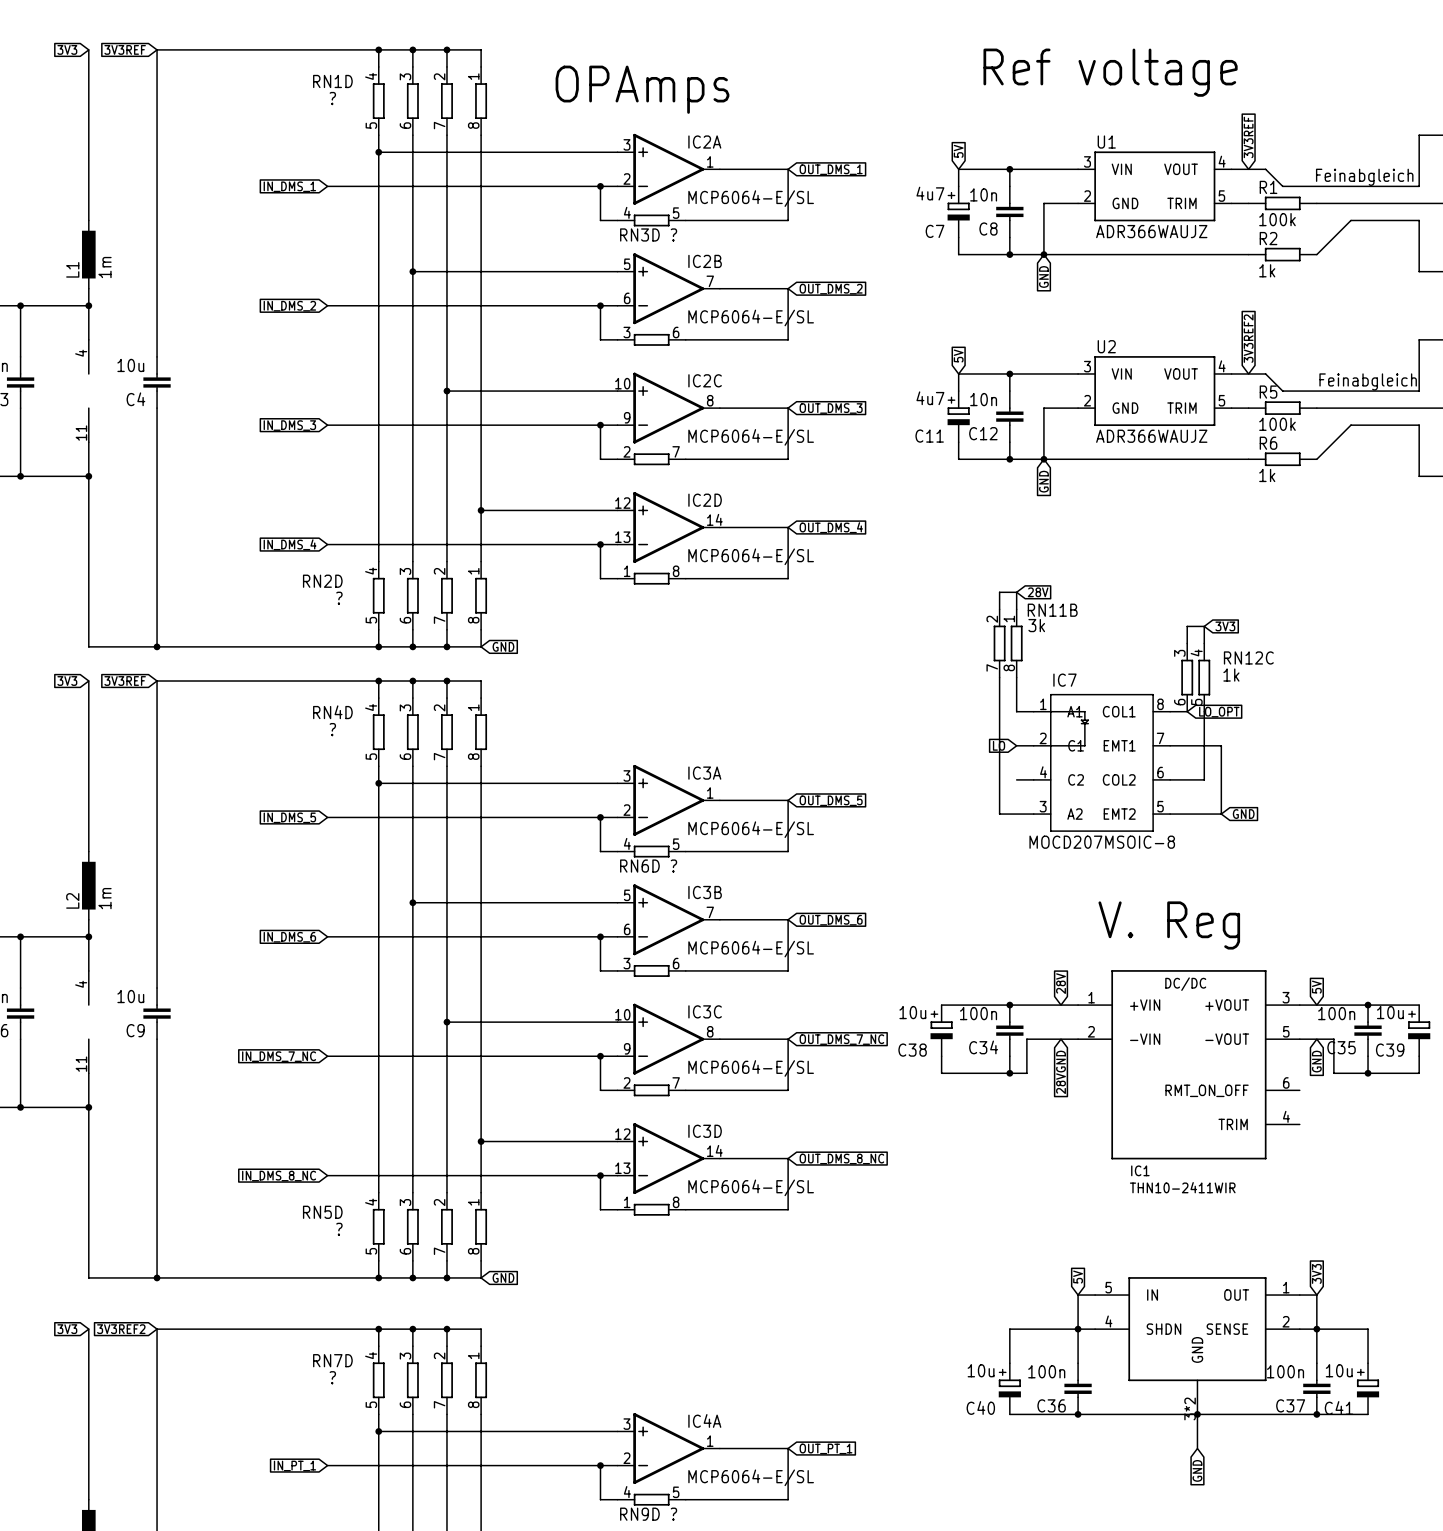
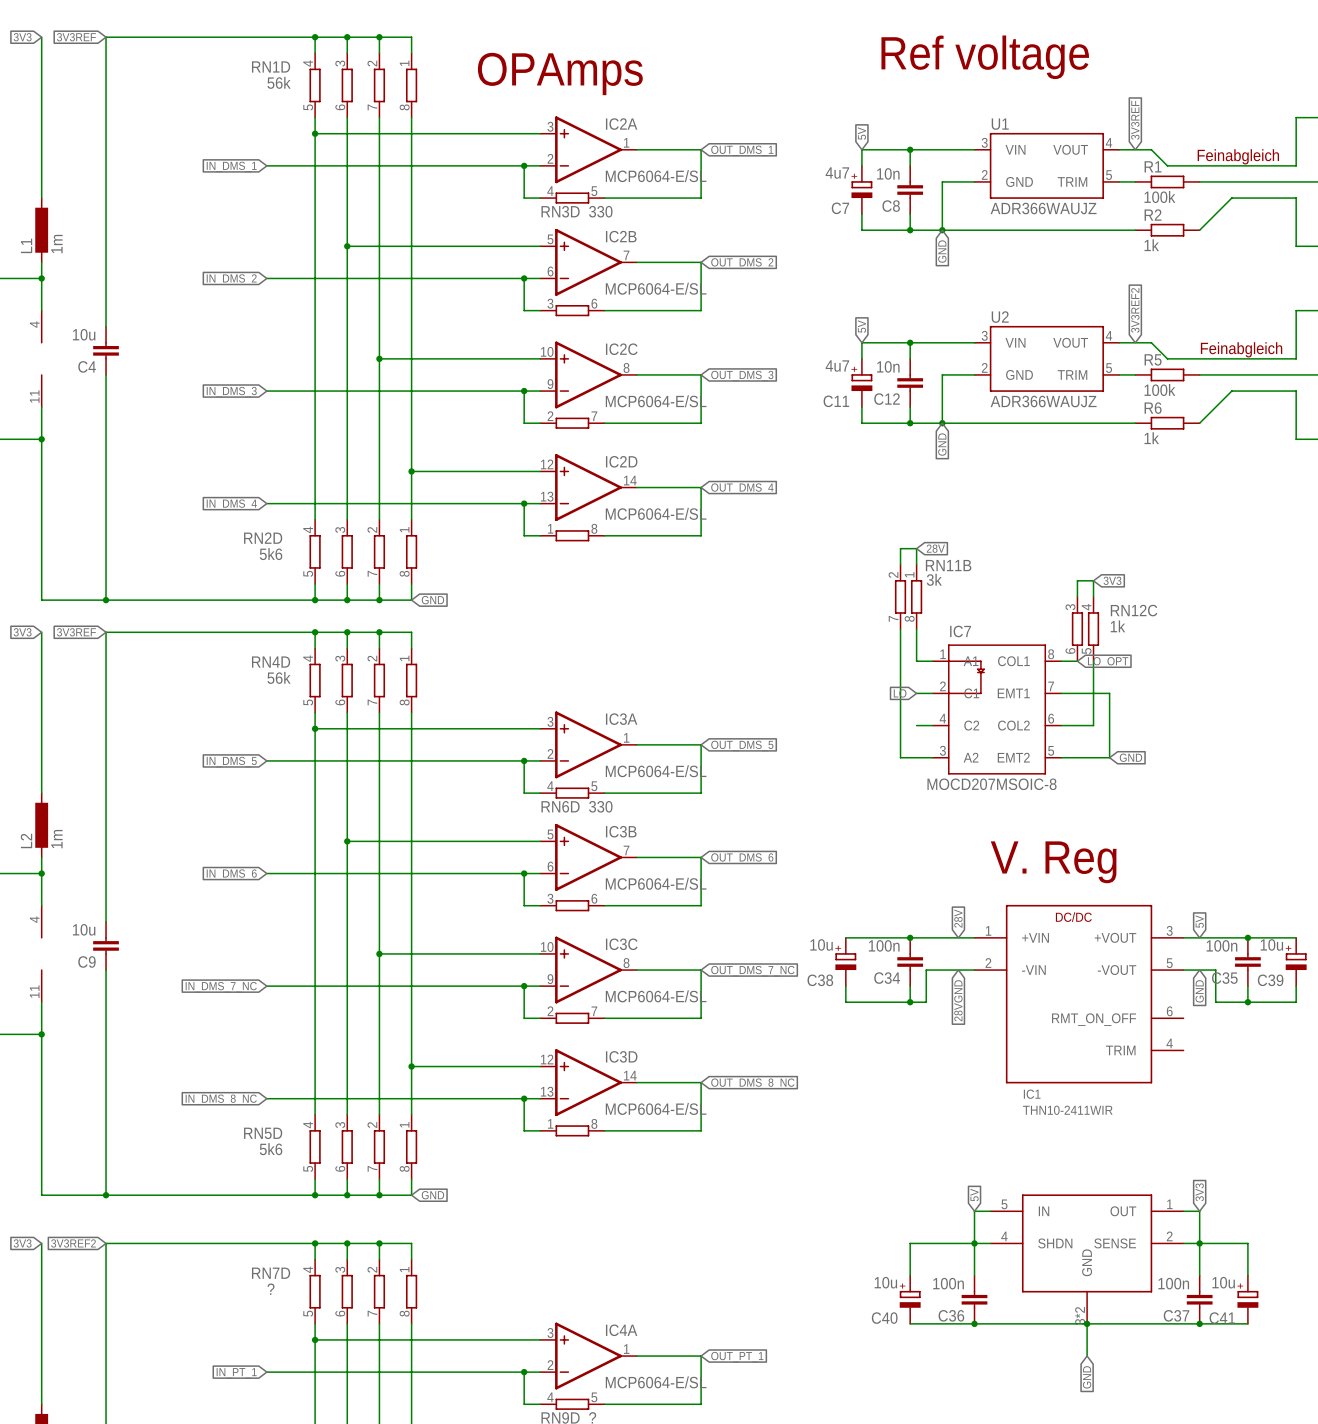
RN1D value: ? (332, 98) -> 56k (279, 82)
RN3D value: ? (673, 234) -> 330 (600, 211)
RN2D value: ? (339, 598) -> 5k6 (271, 554)
RN4D value: ? (332, 729) -> 56k (279, 677)
RN6D value: ? (673, 866) -> 330 (600, 806)
RN5D value: ? (339, 1229) -> 5k6 (271, 1149)

